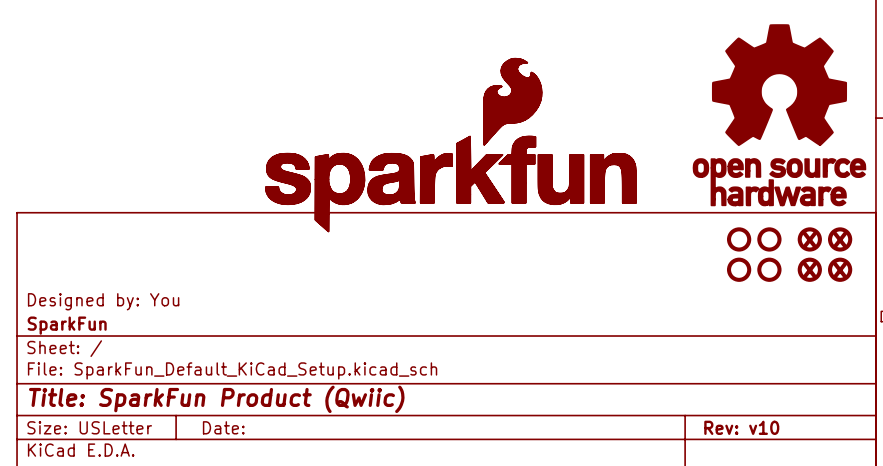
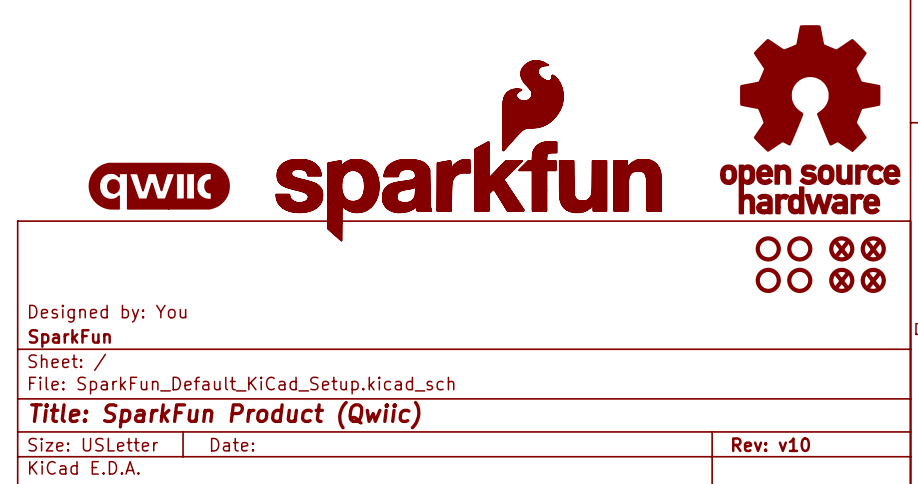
part: none -> (159, 186)

